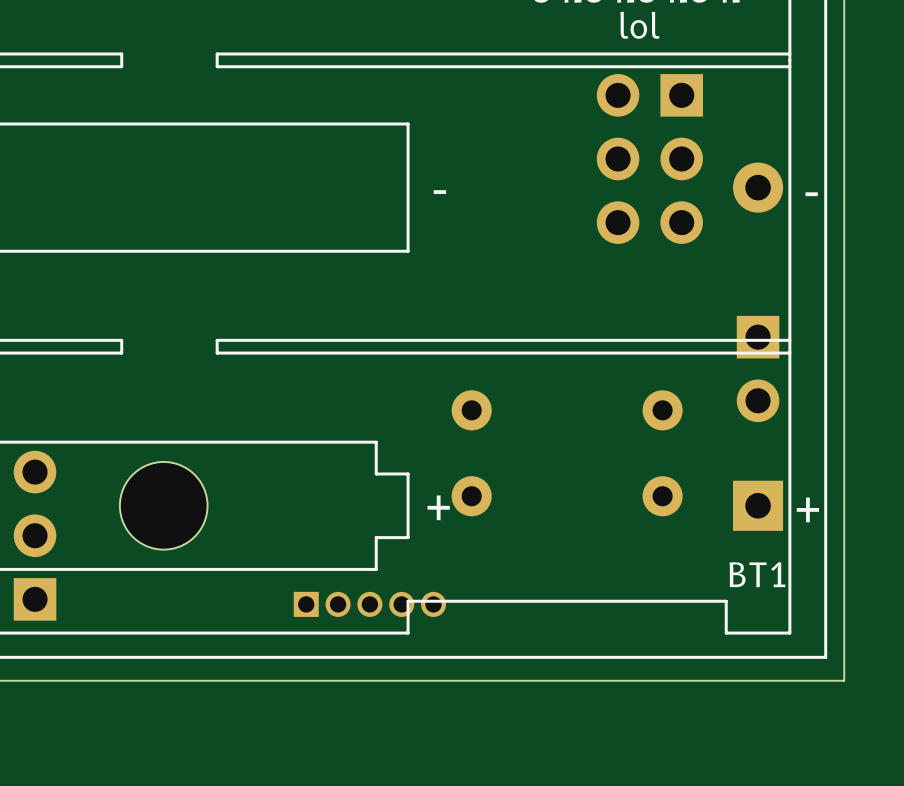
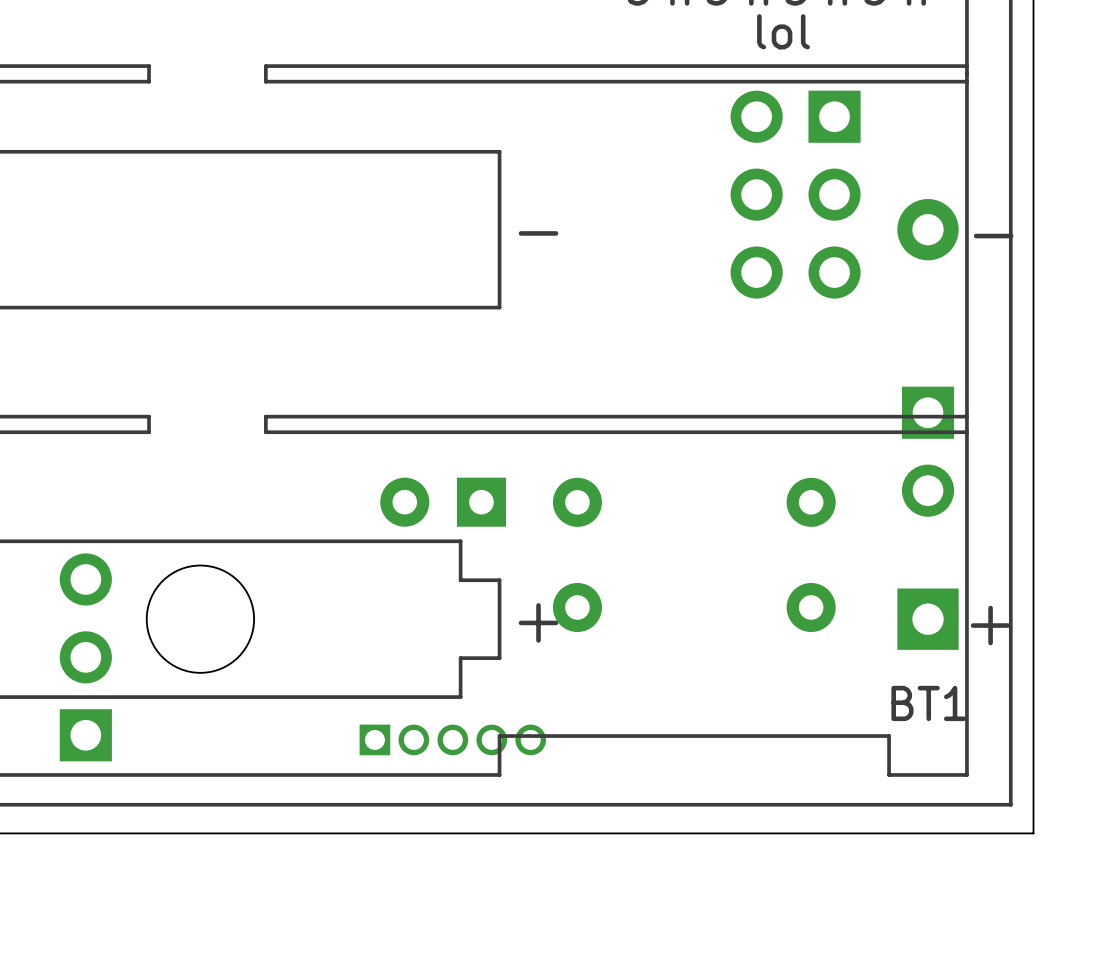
part: none -> (443, 502)
part position: (35, 535) -> (85, 657)

